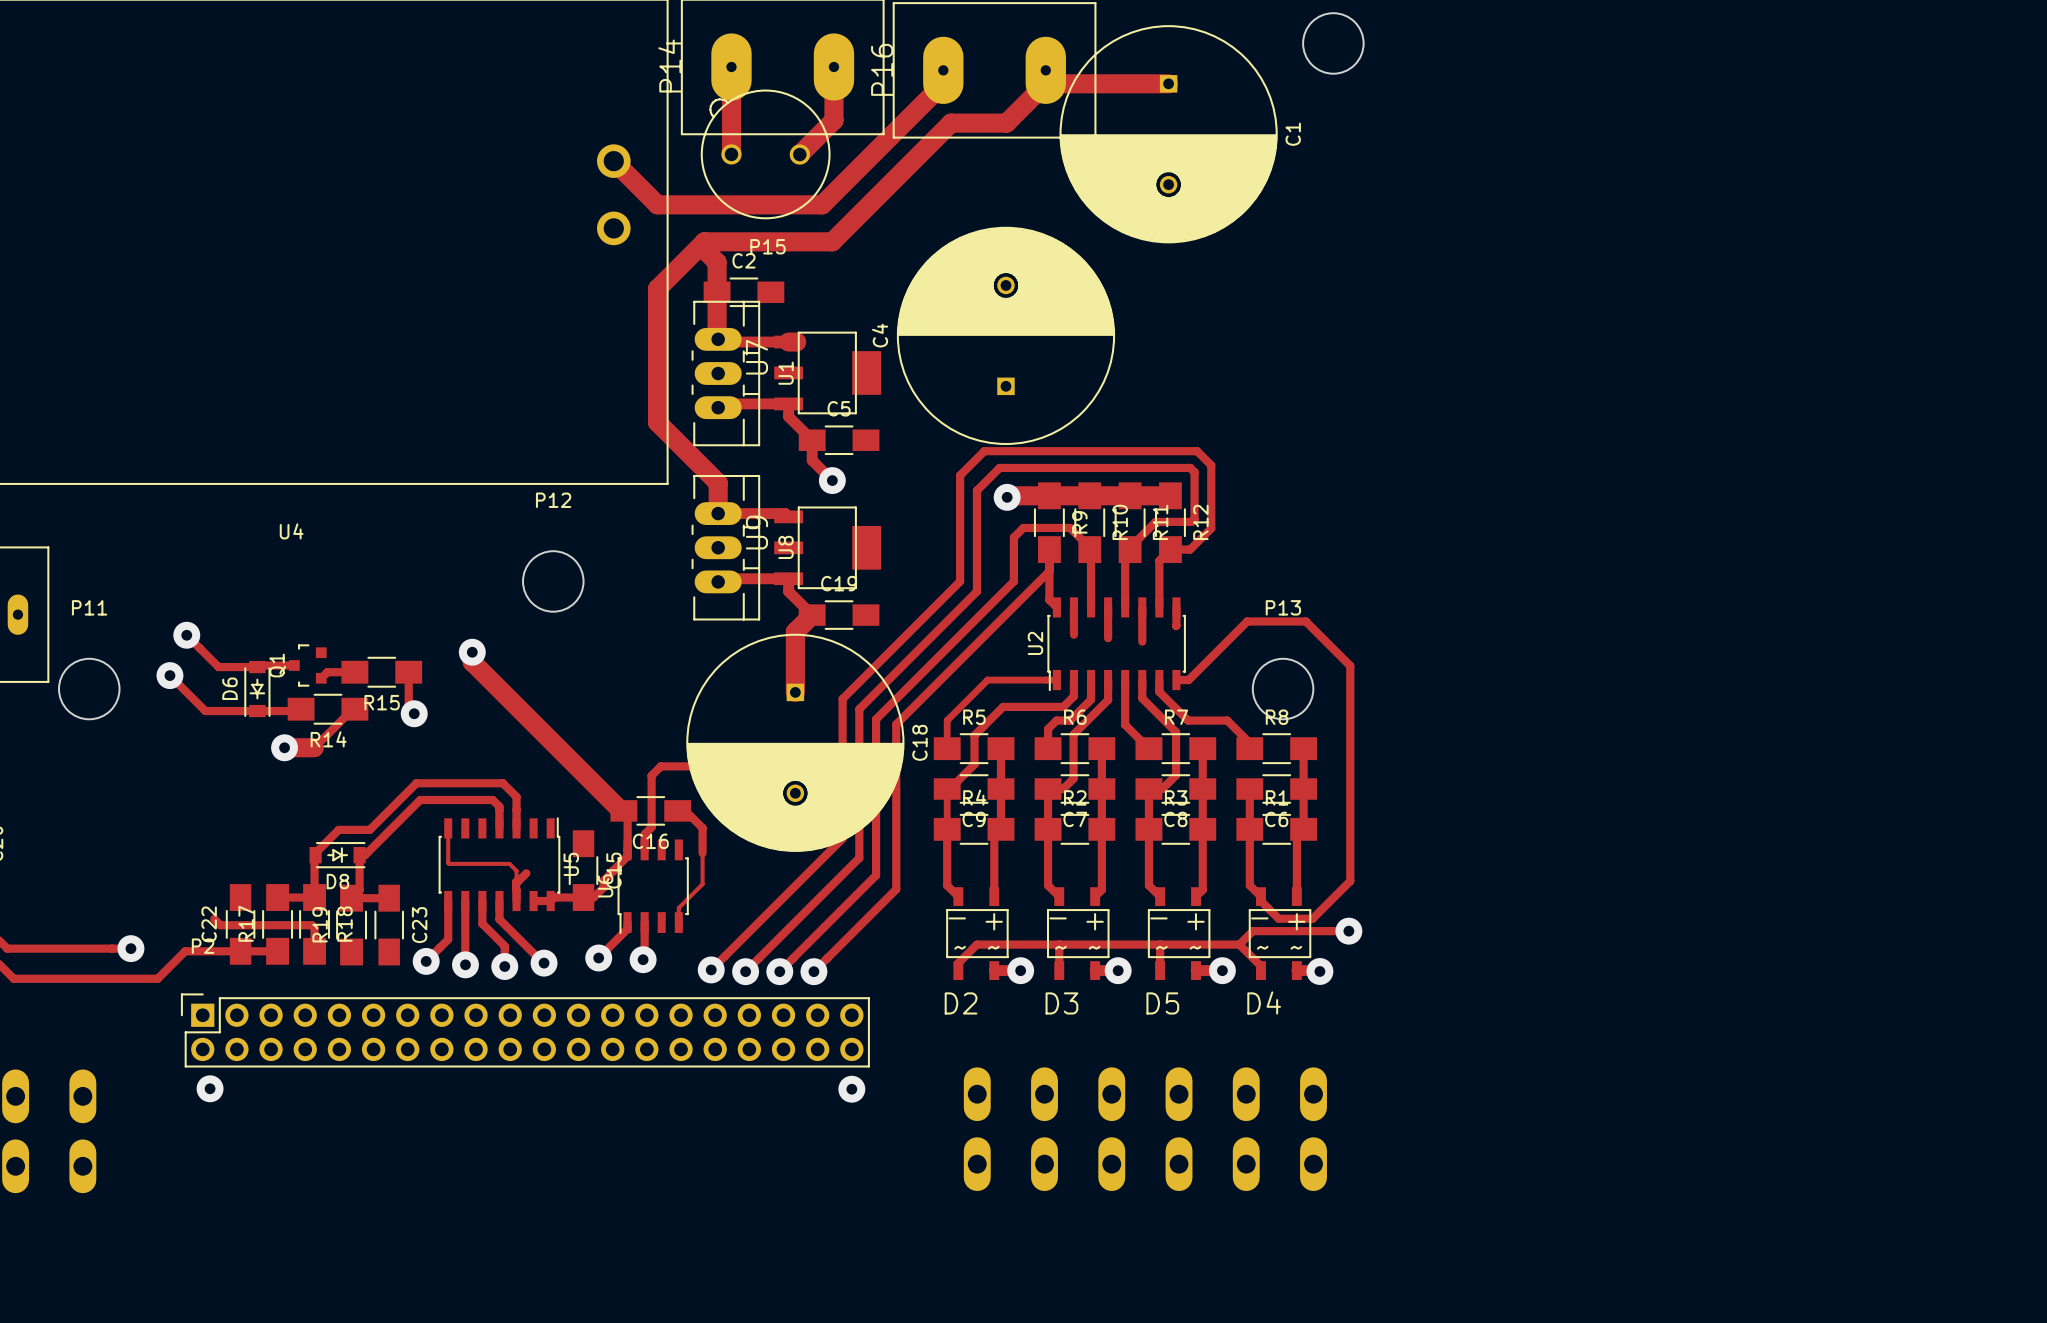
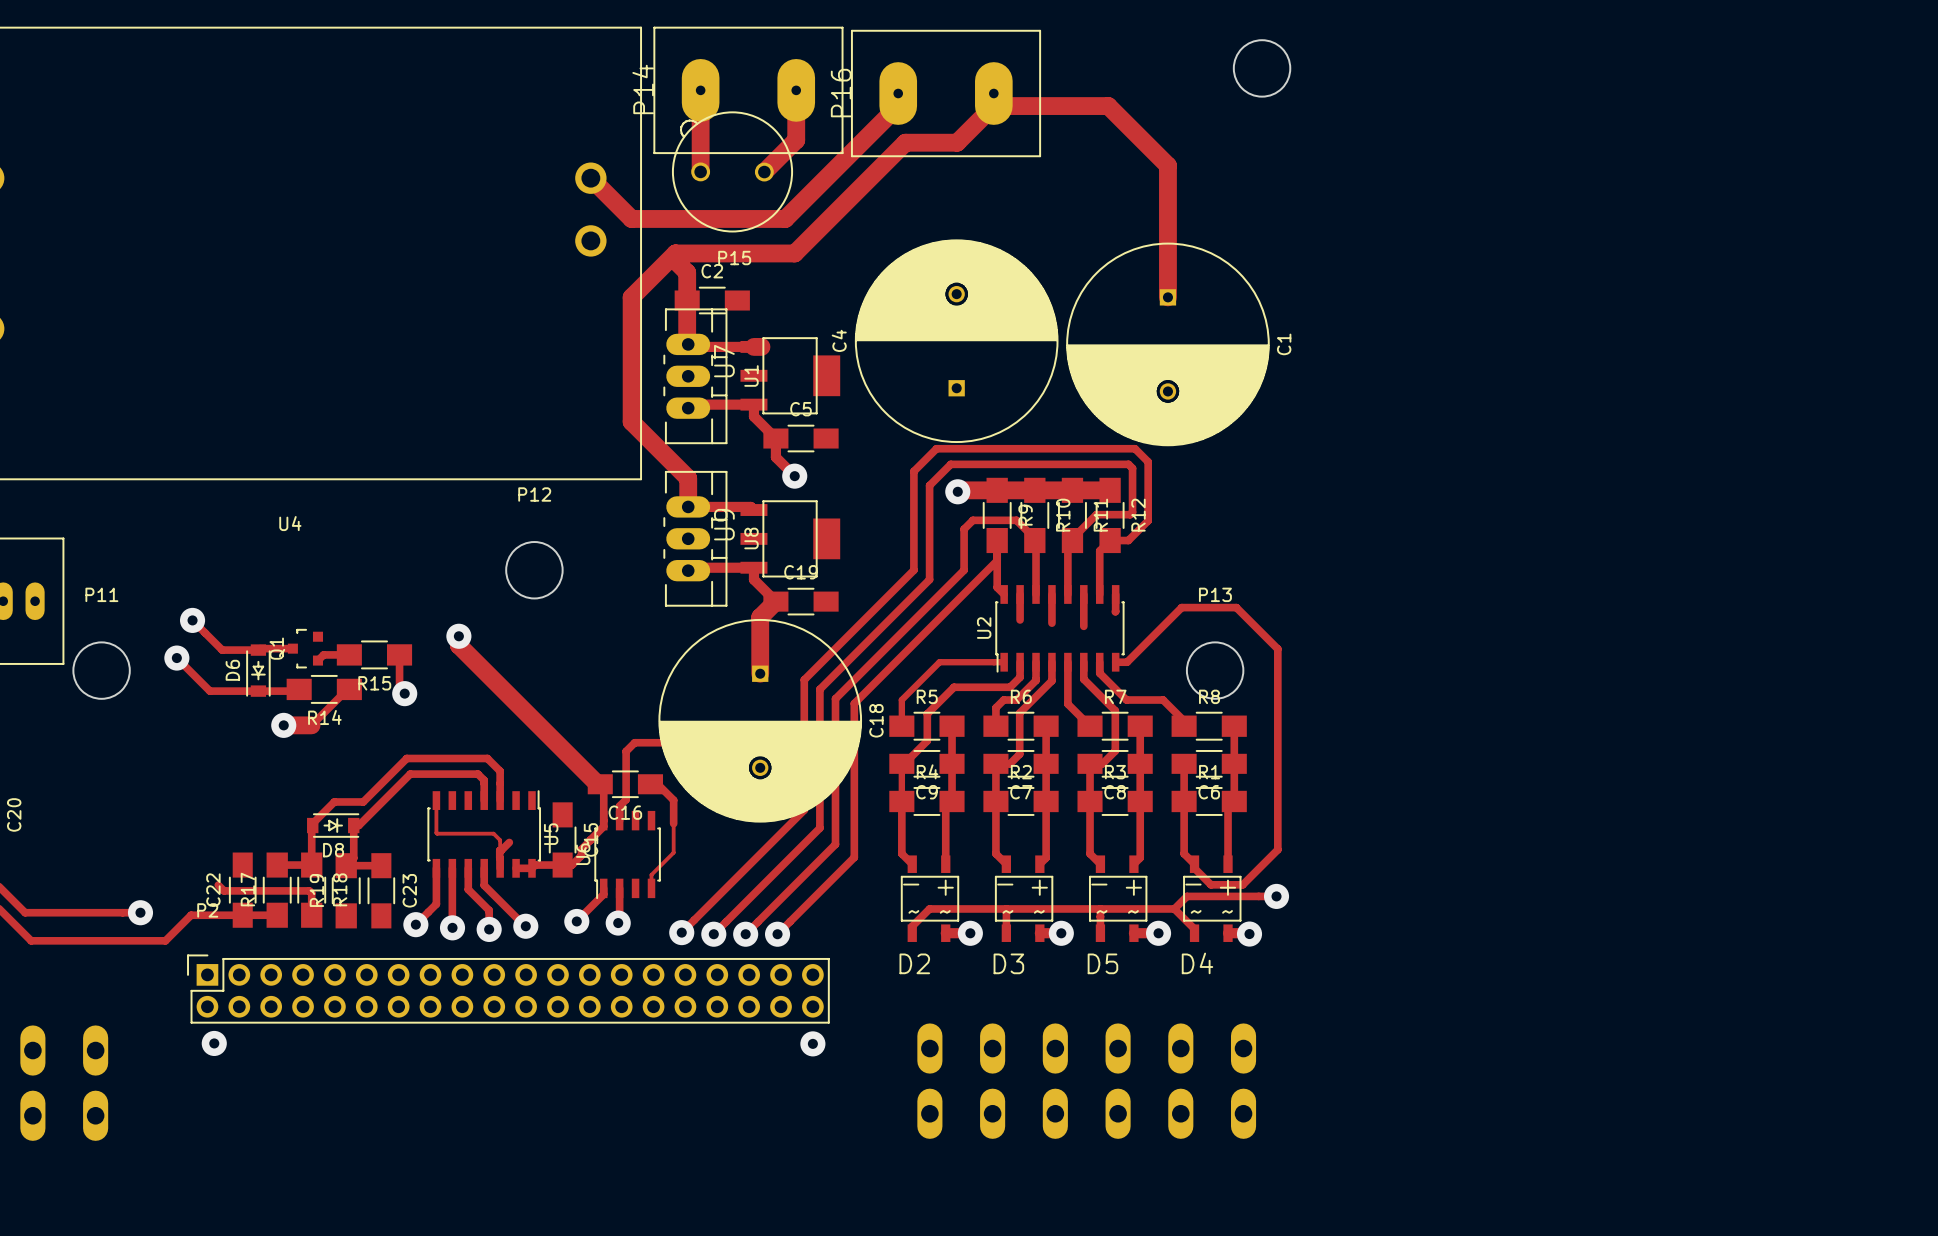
track: none -> (1108, 106) (1167, 165) (1167, 297)
C1 position: (1168, 134) -> (1167, 344)

